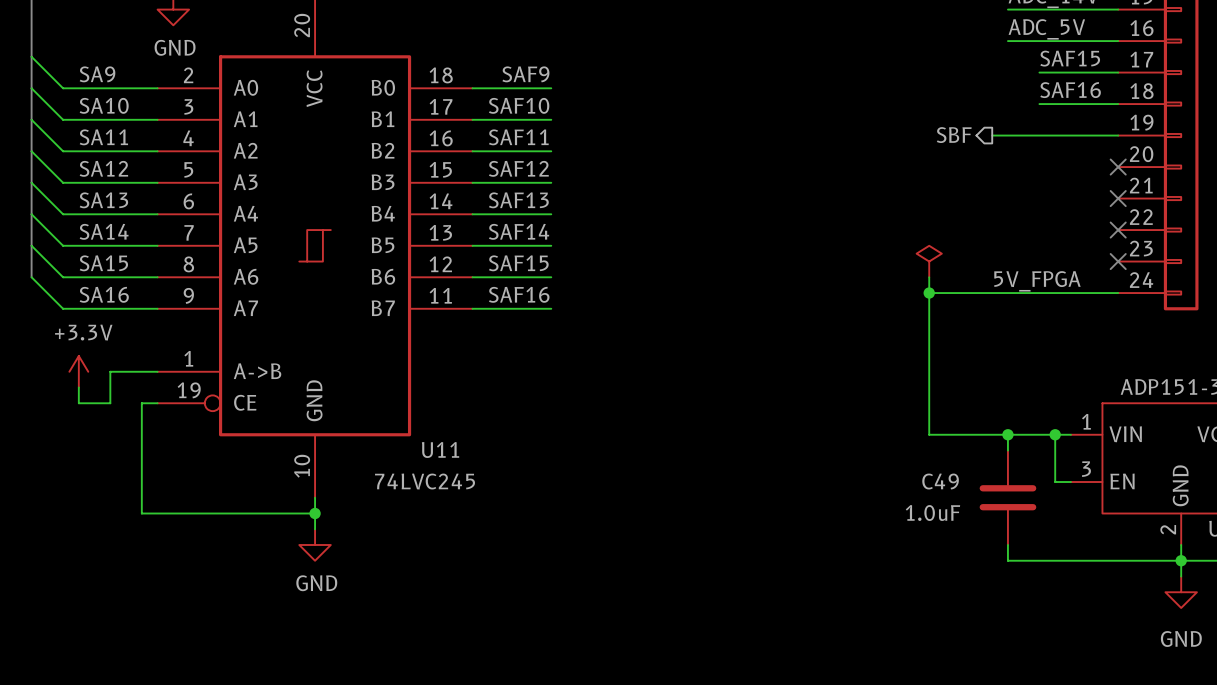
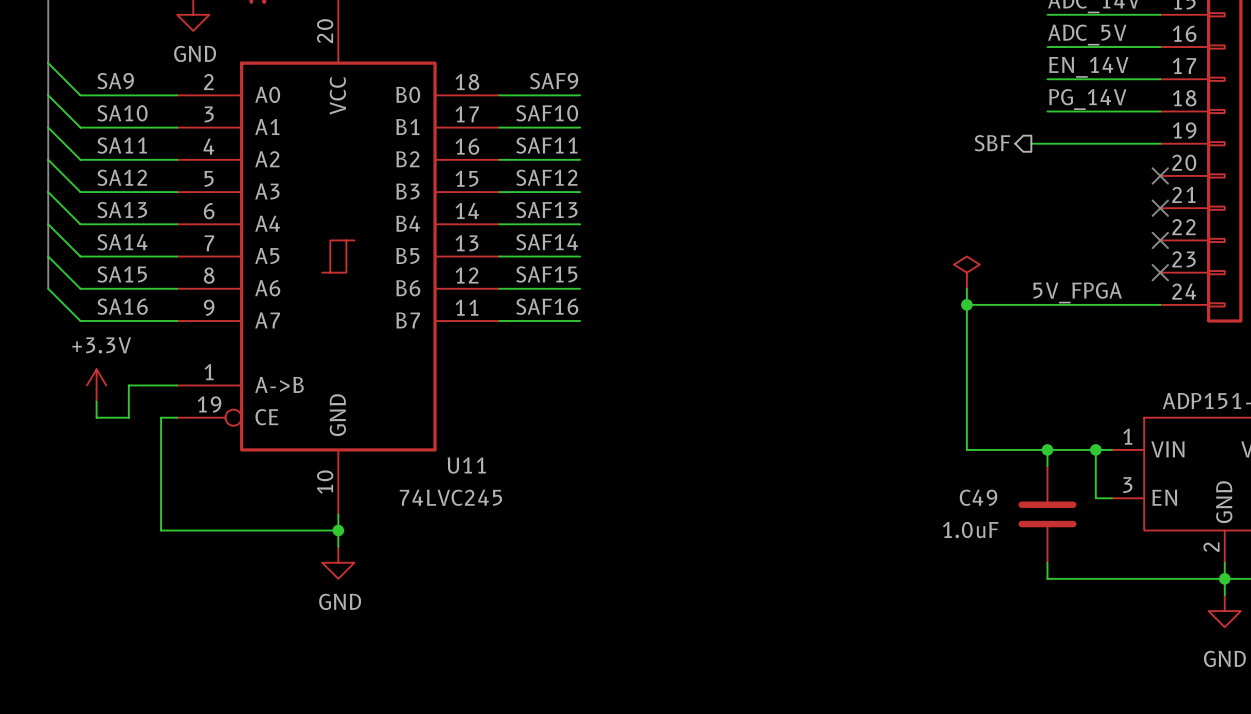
label: SAF15 (1070, 58) -> none
label: none -> EN_14V (1088, 67)
wire: none -> (1047, 79) (1079, 79)
label: SAF16 (1070, 90) -> none
label: none -> PG_14V (1087, 99)
wire: none -> (1047, 111) (1079, 111)

